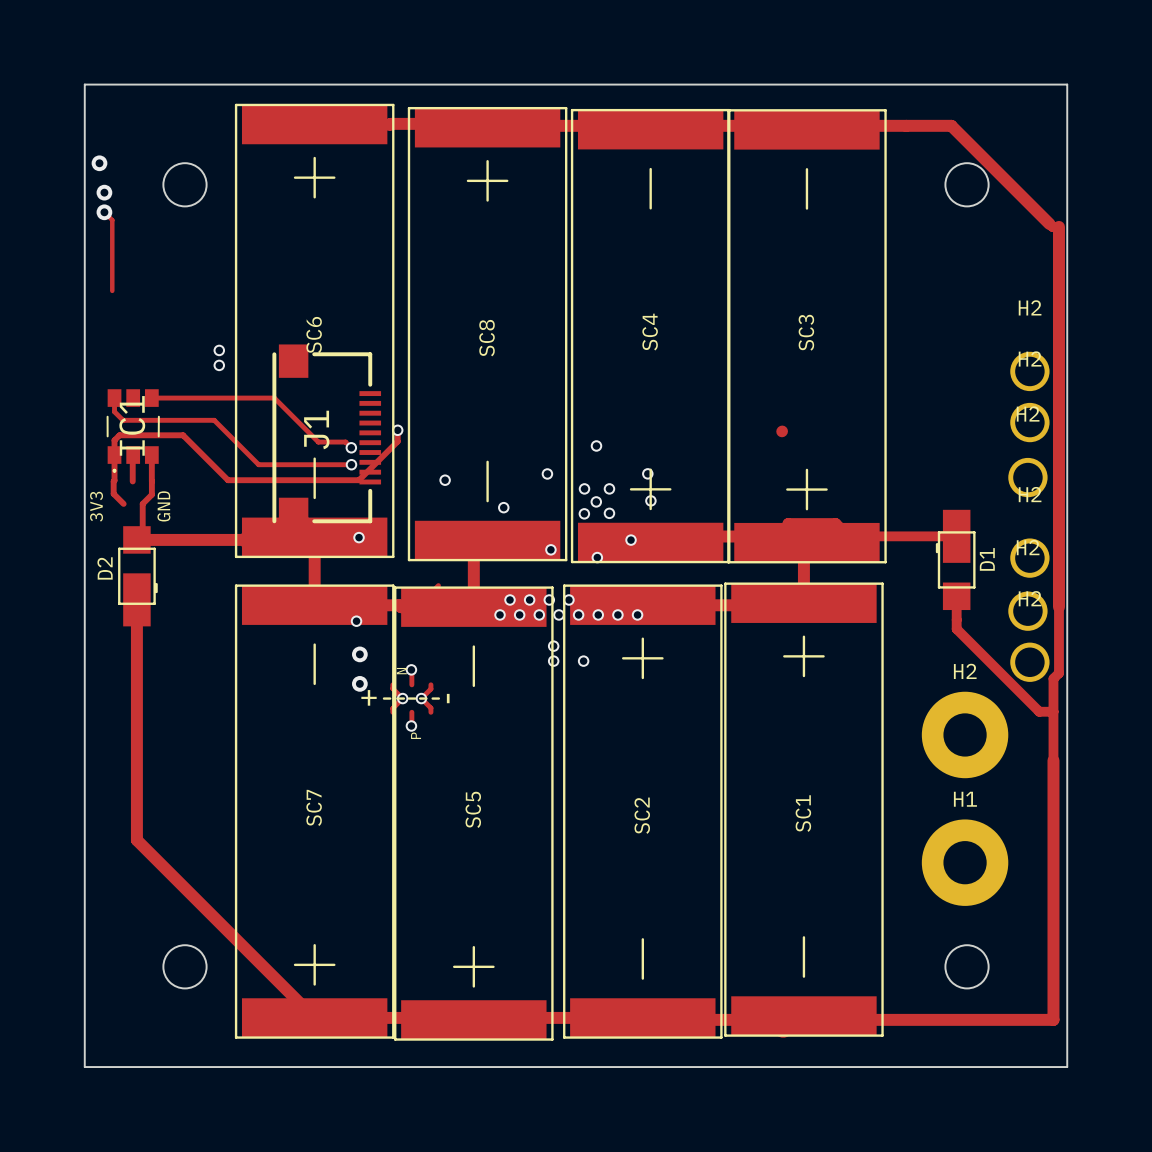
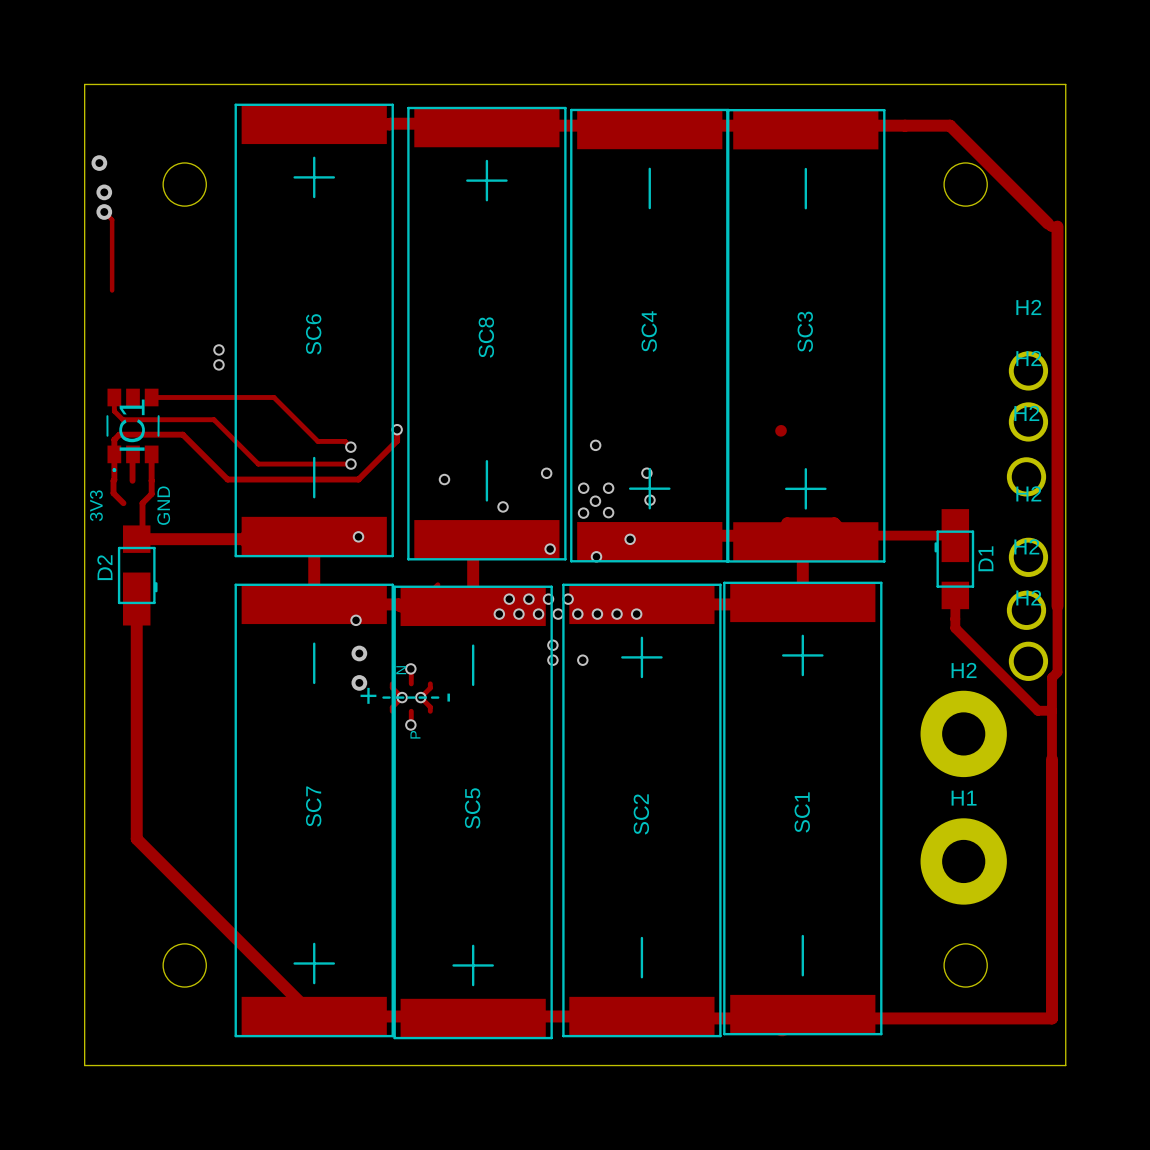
J1: (326, 437) -> none

